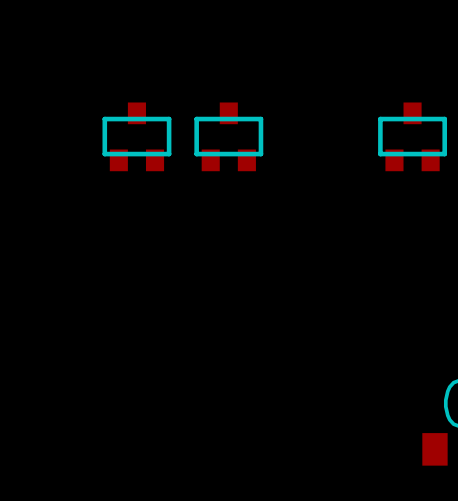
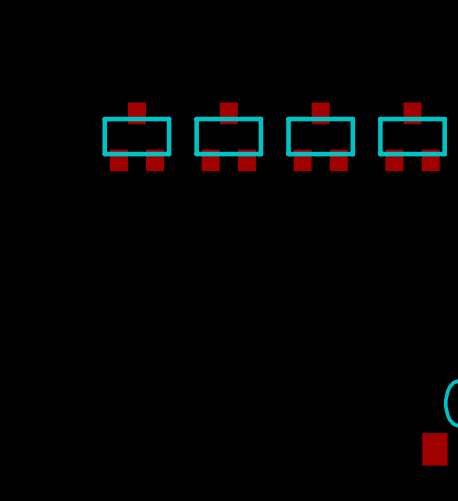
part: none -> (320, 136)

